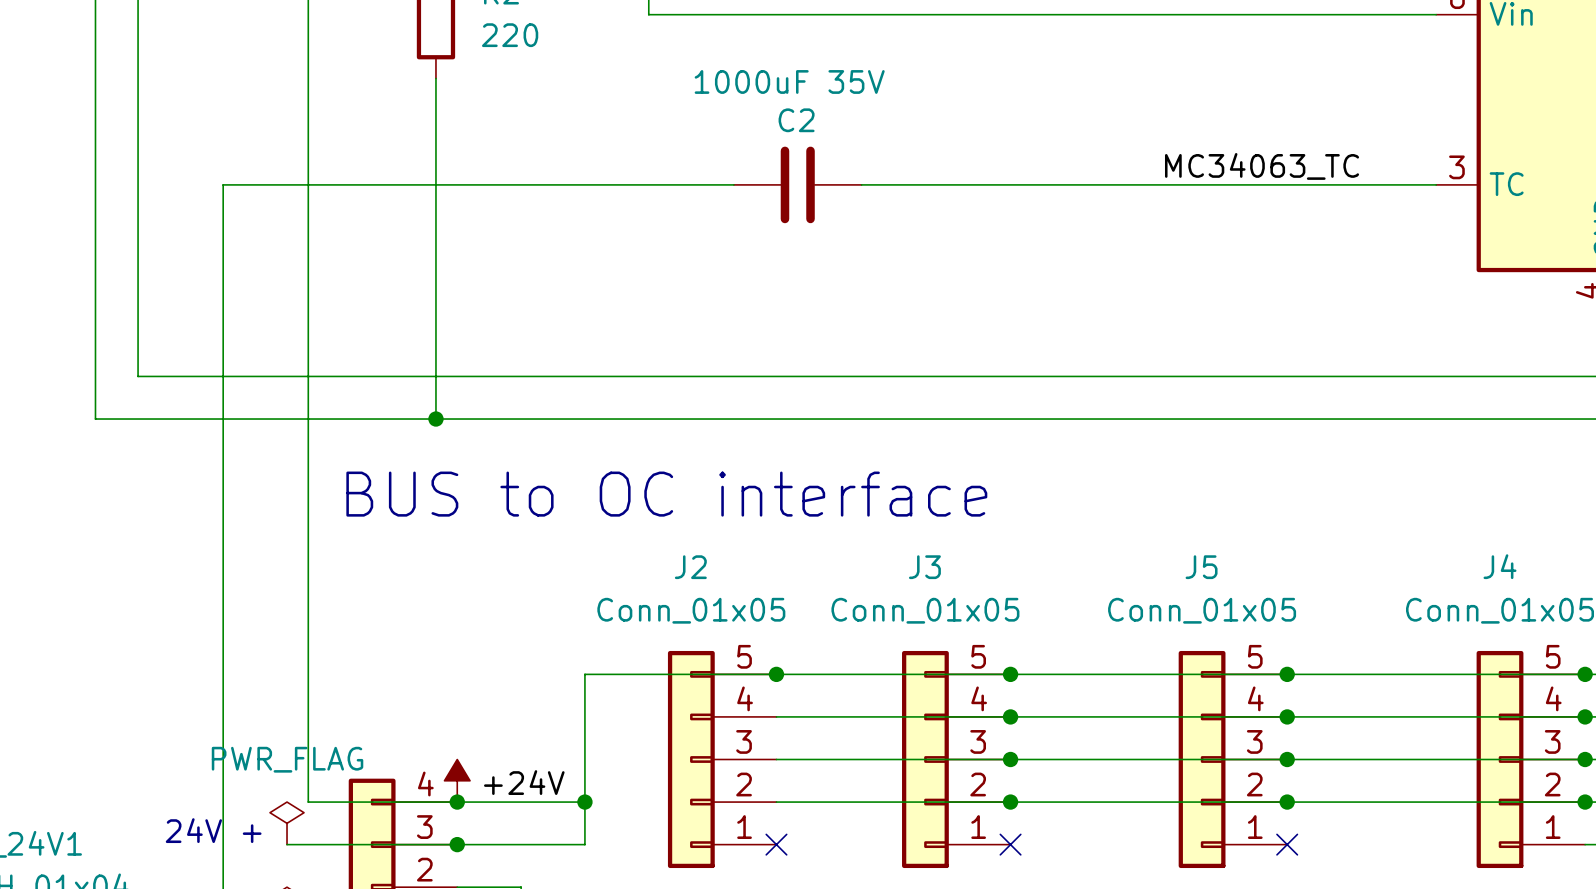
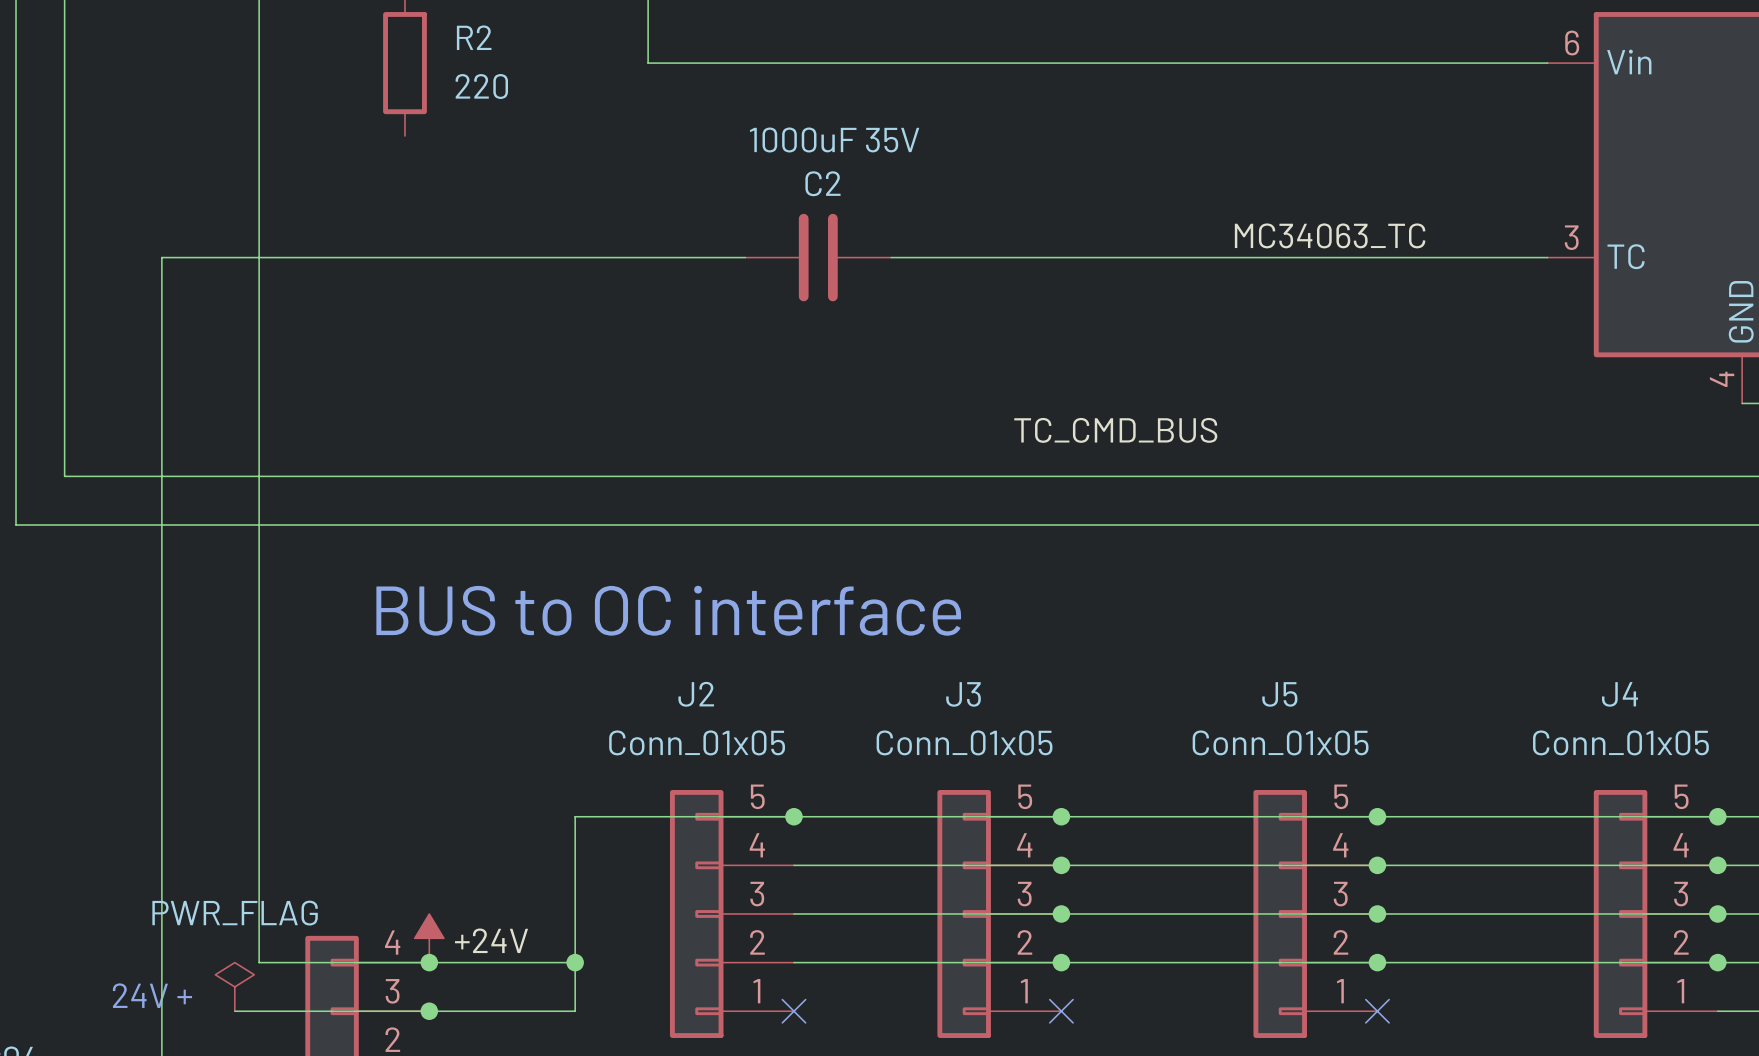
wire: (435, 78) (435, 419) -> none
label: none -> TC_CMD_BUS (1115, 430)
junction: (435, 419) -> none

